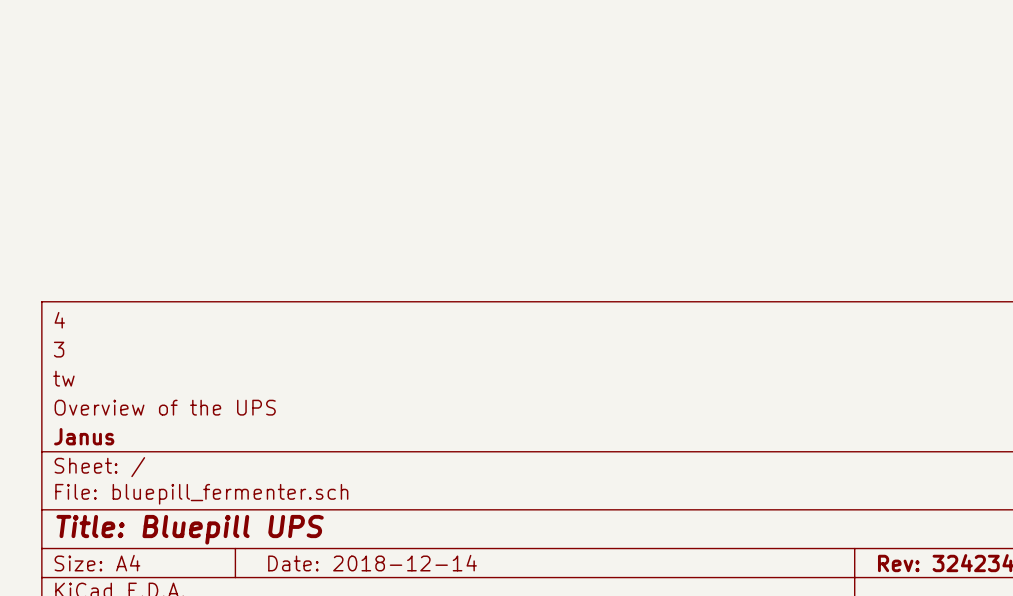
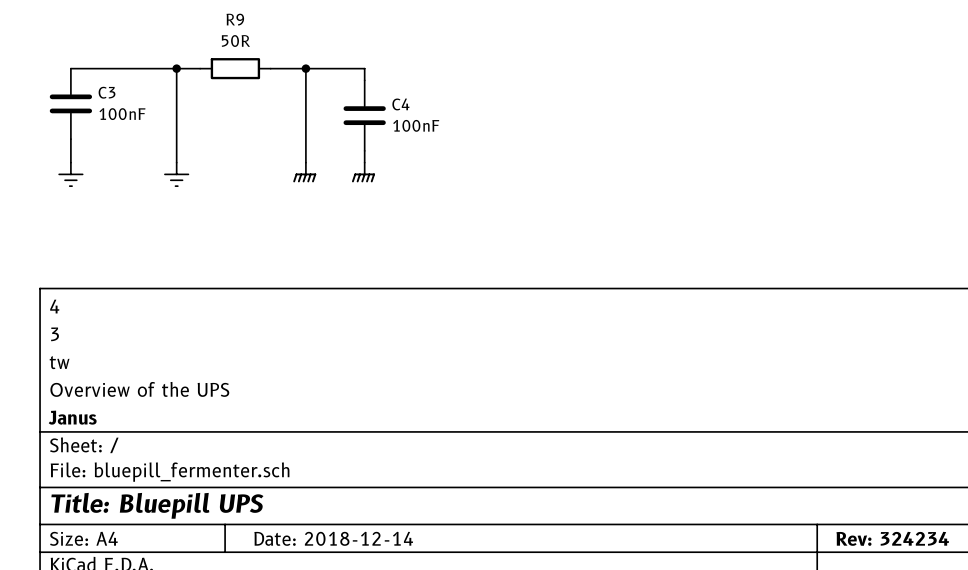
wire: none -> (70, 68) (200, 68)
wire: none -> (176, 68) (176, 162)
junction: none -> (176, 68)
R9: none -> 50R (235, 68)
wire: none -> (270, 68) (364, 68) (364, 80)
wire: none -> (305, 68) (305, 162)
junction: none -> (305, 68)
C3: none -> 100nF (70, 103)
C4: none -> 100nF (364, 115)
wire: none -> (70, 139) (70, 162)
wire: none -> (364, 150) (364, 162)
power symbol: none -> (304, 172)
power symbol: none -> (363, 172)
power symbol: none -> (70, 174)
power symbol: none -> (176, 174)

